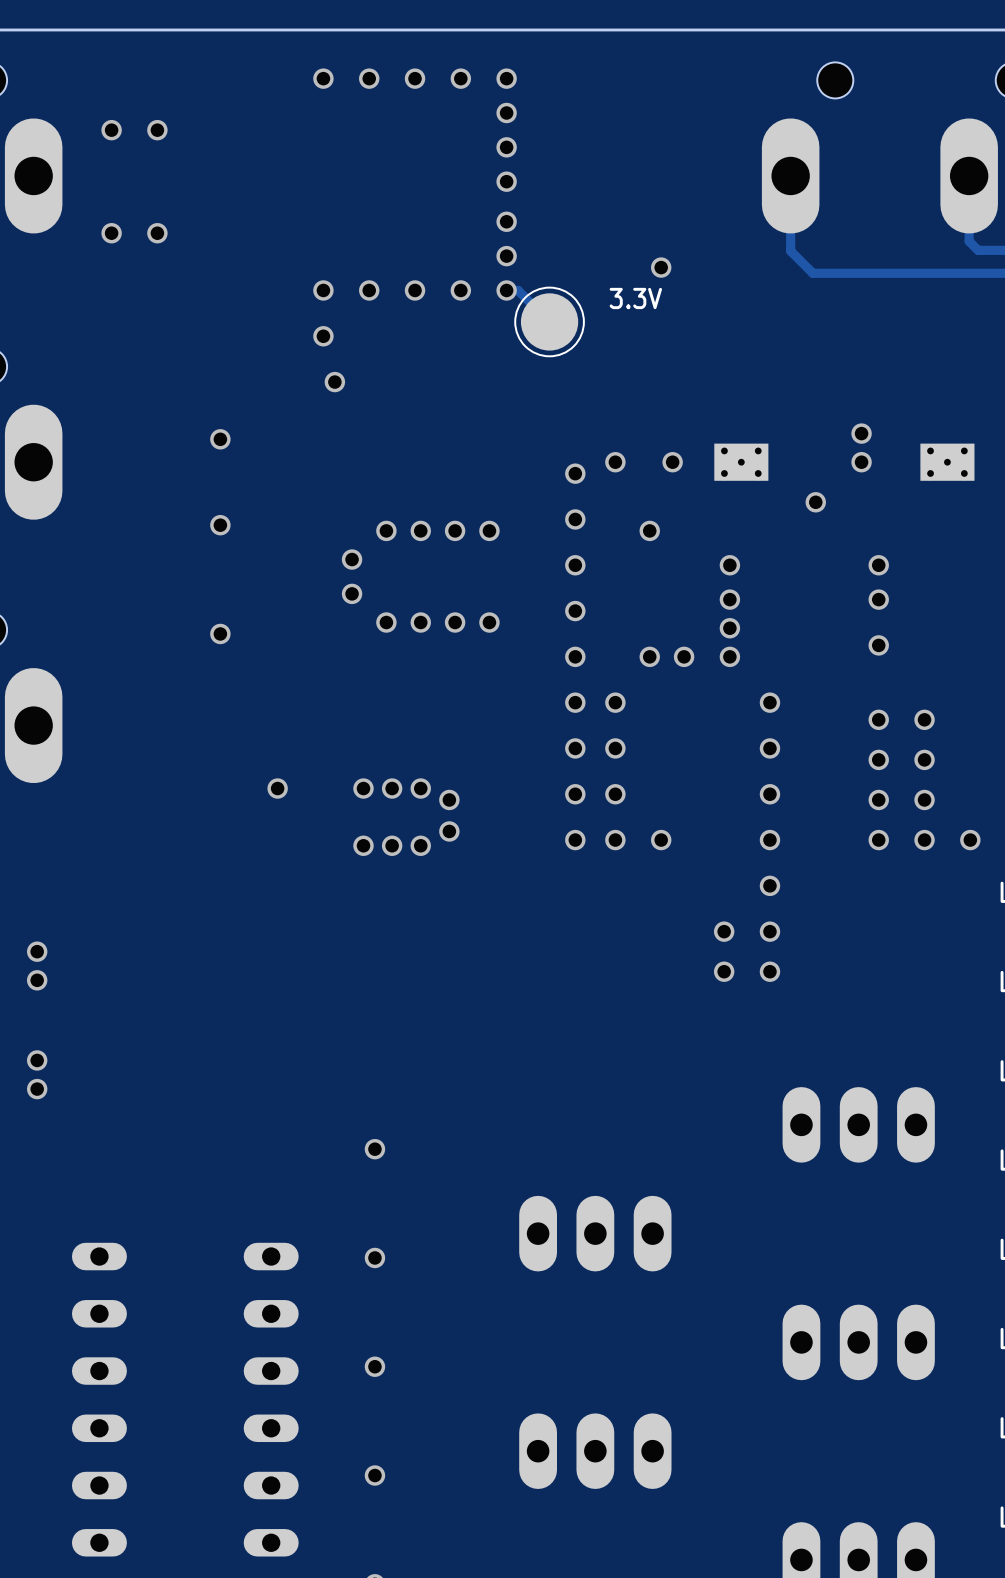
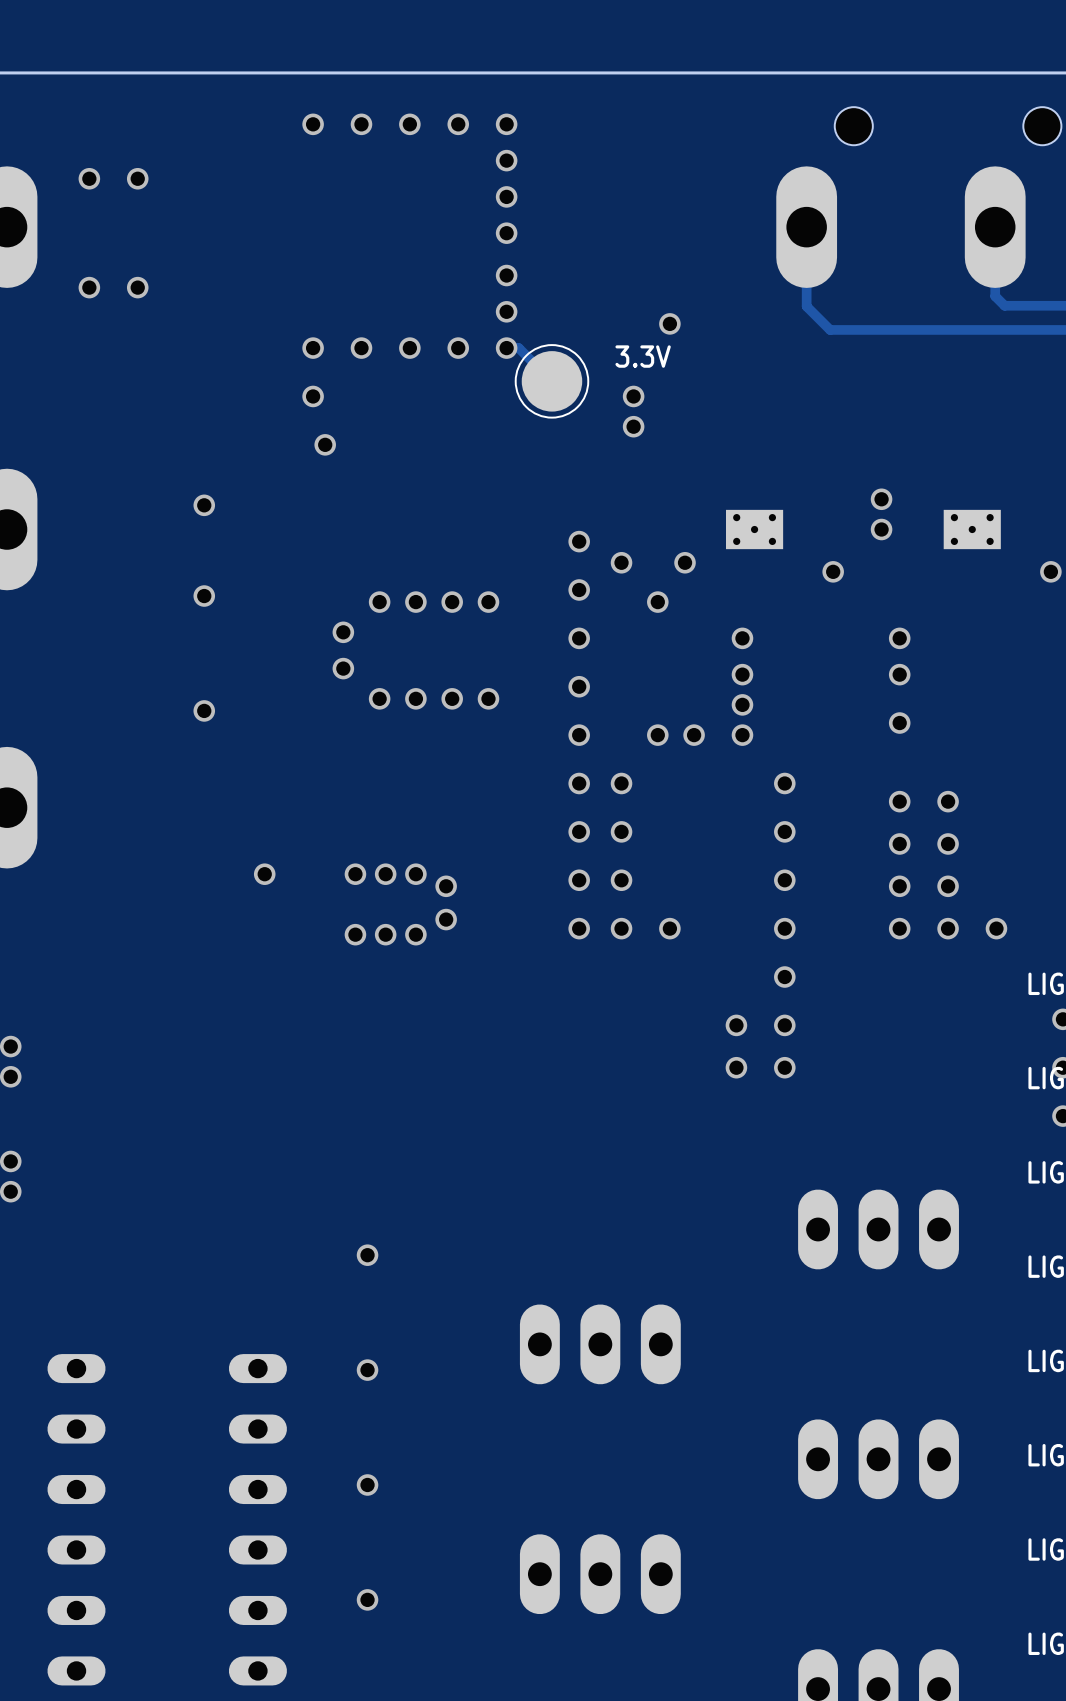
via: none -> (633, 396)
via: none -> (633, 426)
via position: (615, 462) -> (621, 562)
via position: (672, 462) -> (685, 562)

